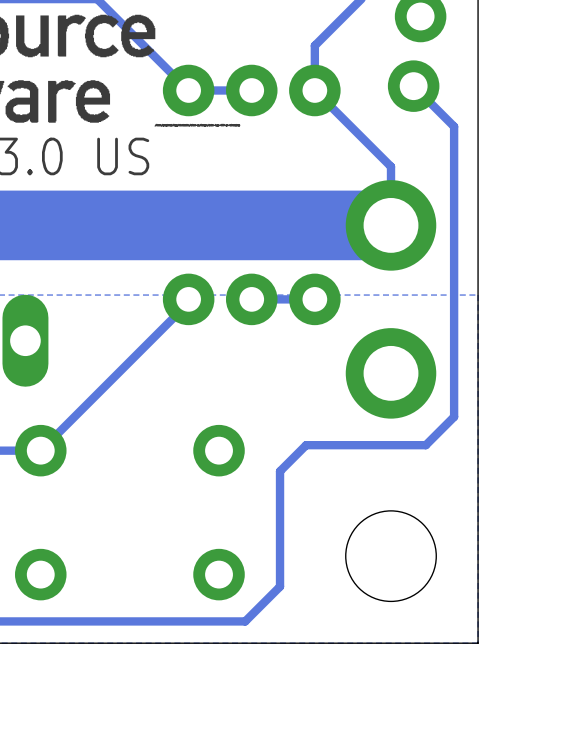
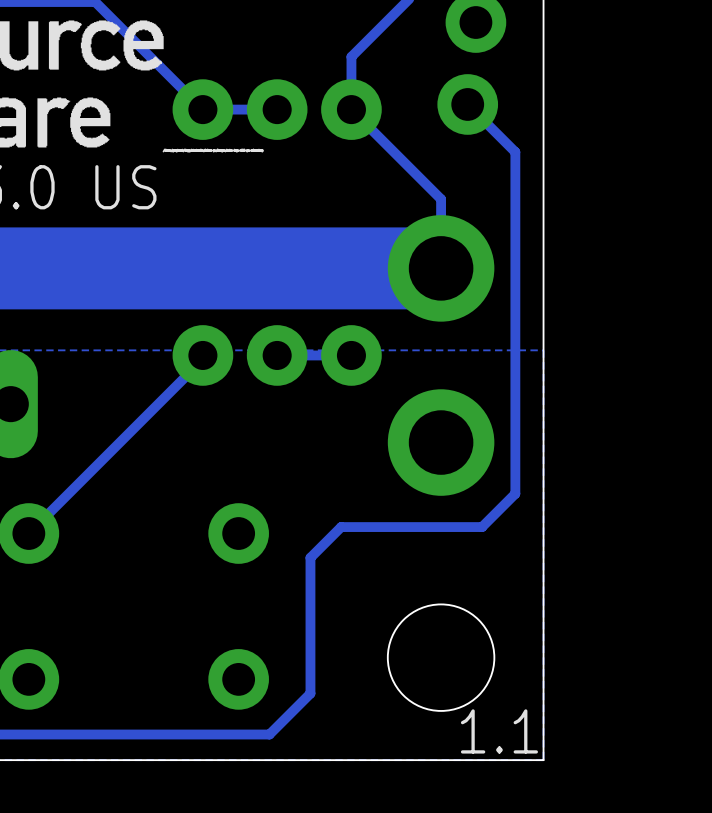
text: none -> 1.1 (499, 731)

